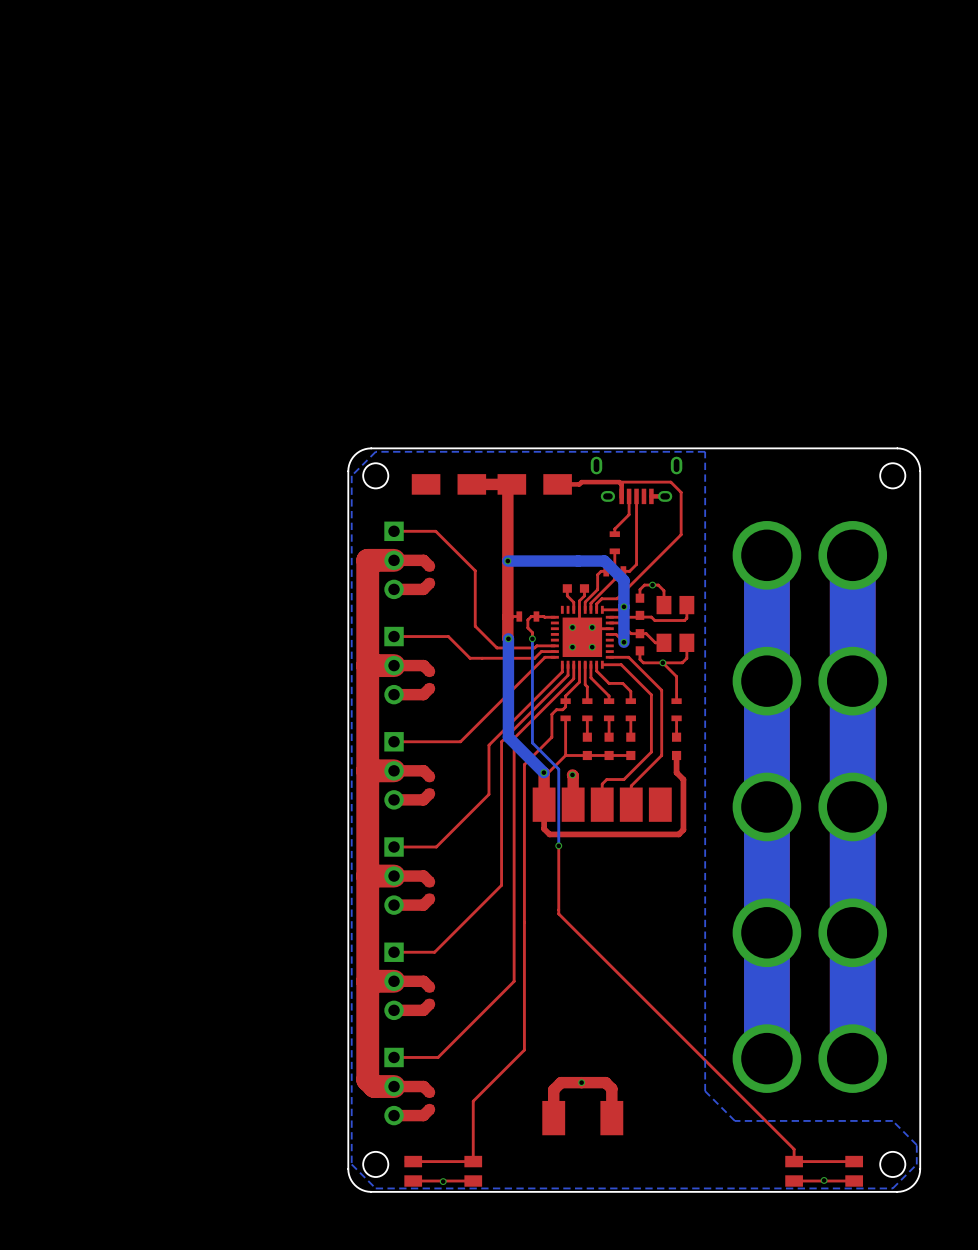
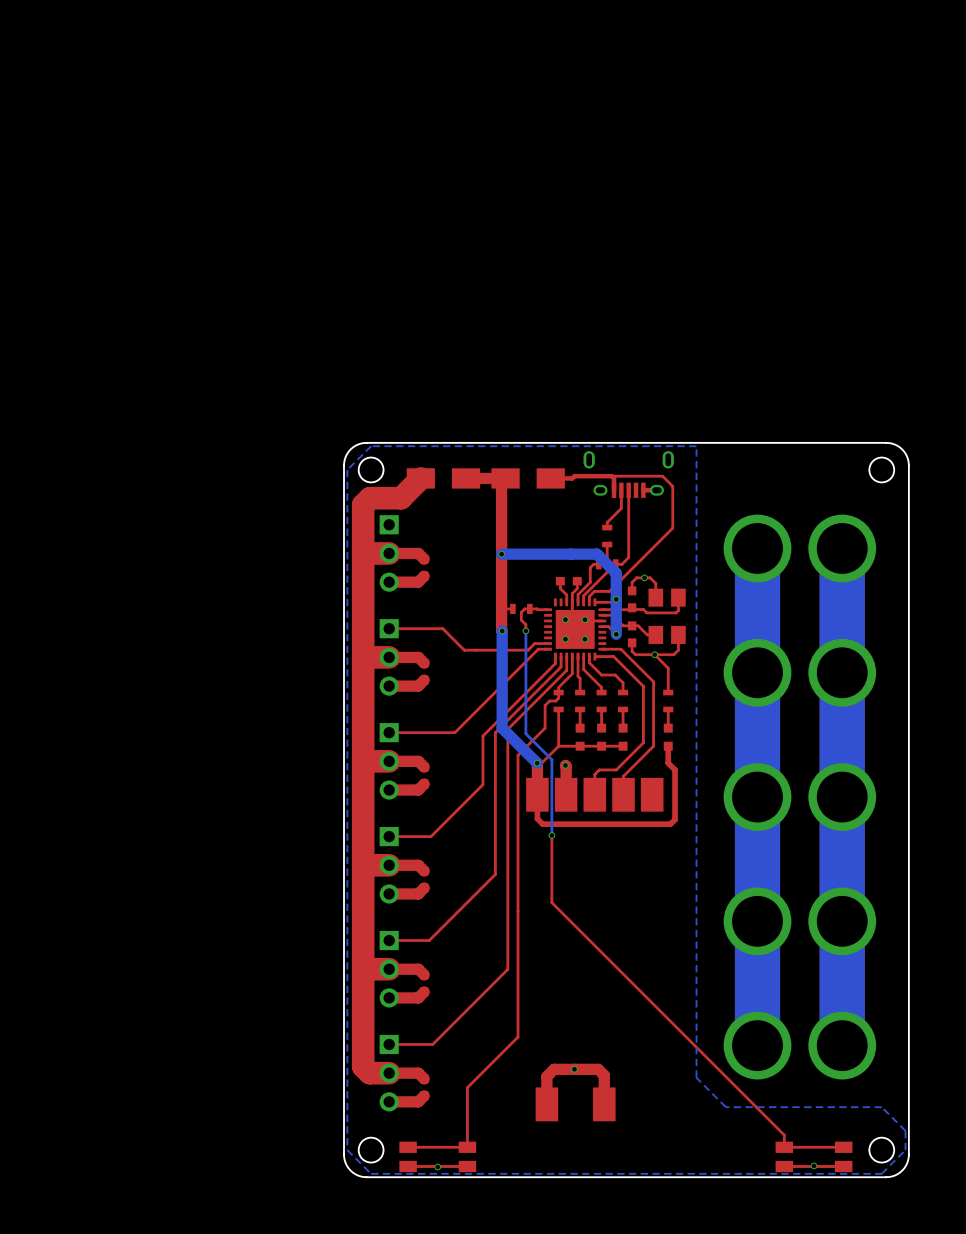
top track: none -> (420, 478) (401, 498) (369, 498) (363, 504) (363, 553)
top track: (394, 531) (435, 531) (475, 570) (475, 626) (496, 647) (554, 645) -> none

